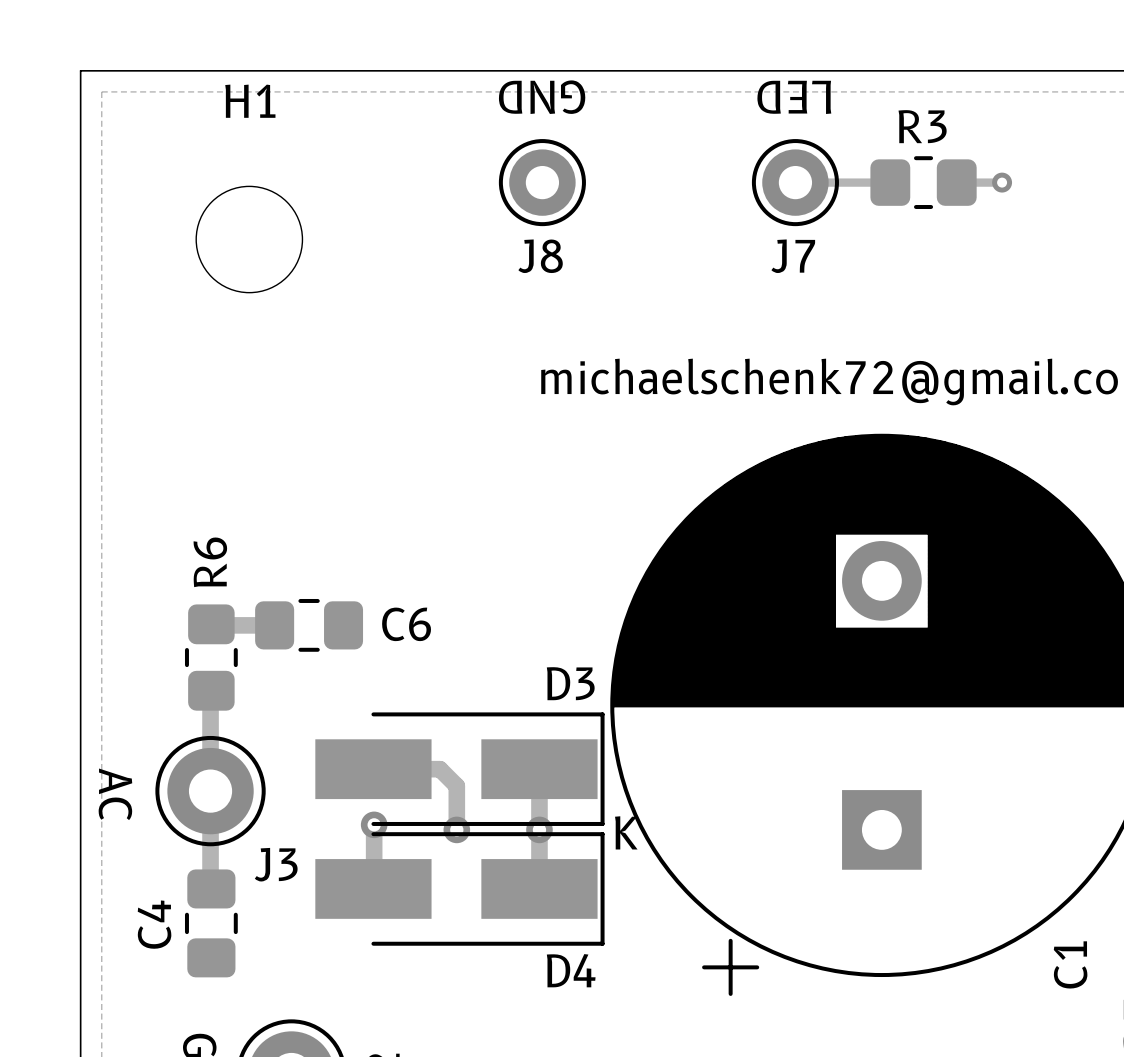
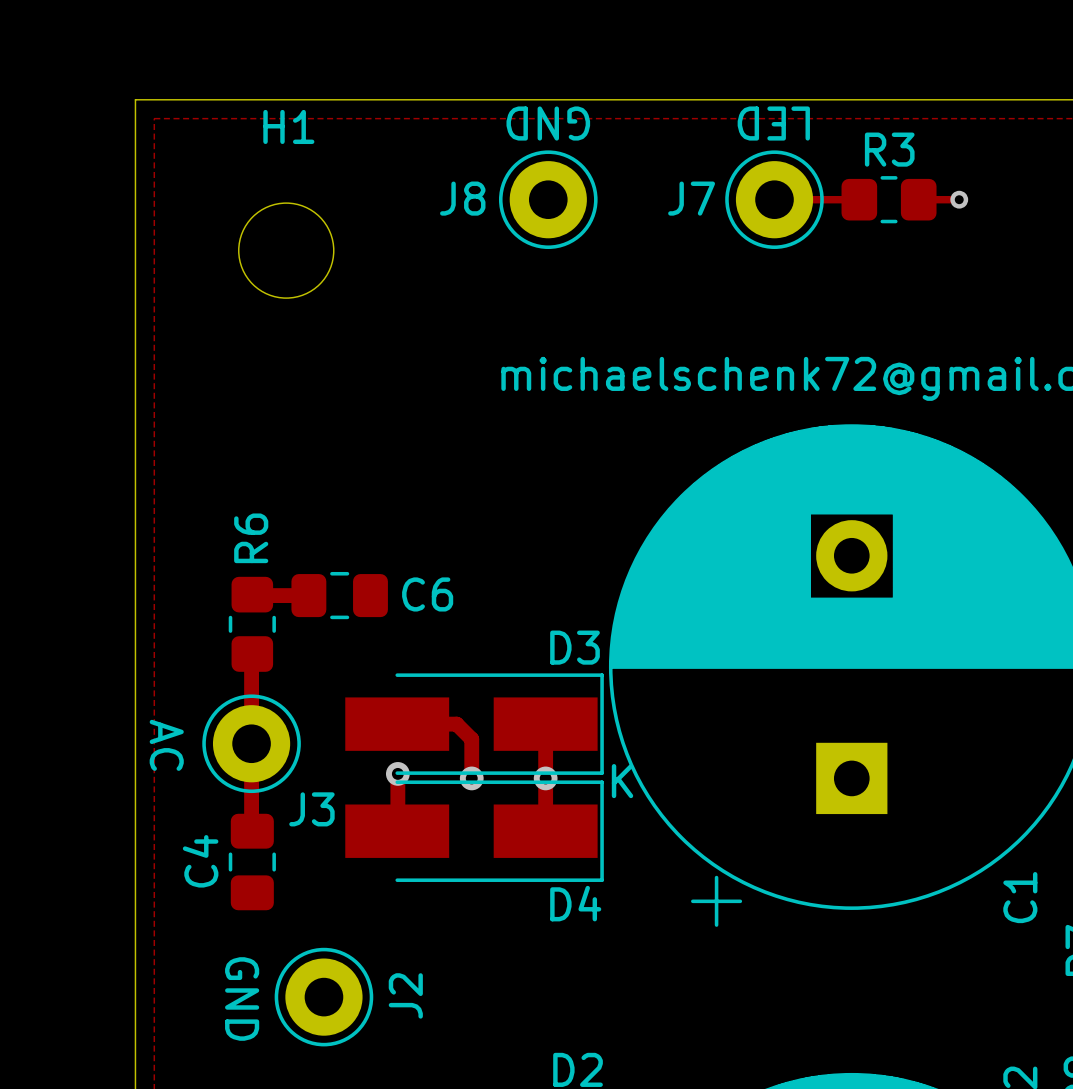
J8 footprint: [498, 139, 586, 227] -> [498, 150, 598, 250]
J7 footprint: [751, 139, 839, 227] -> [725, 150, 824, 250]
J8 name position: J8 (540, 256) -> J8 (462, 198)
J7 name position: J7 (793, 256) -> J7 (691, 198)

